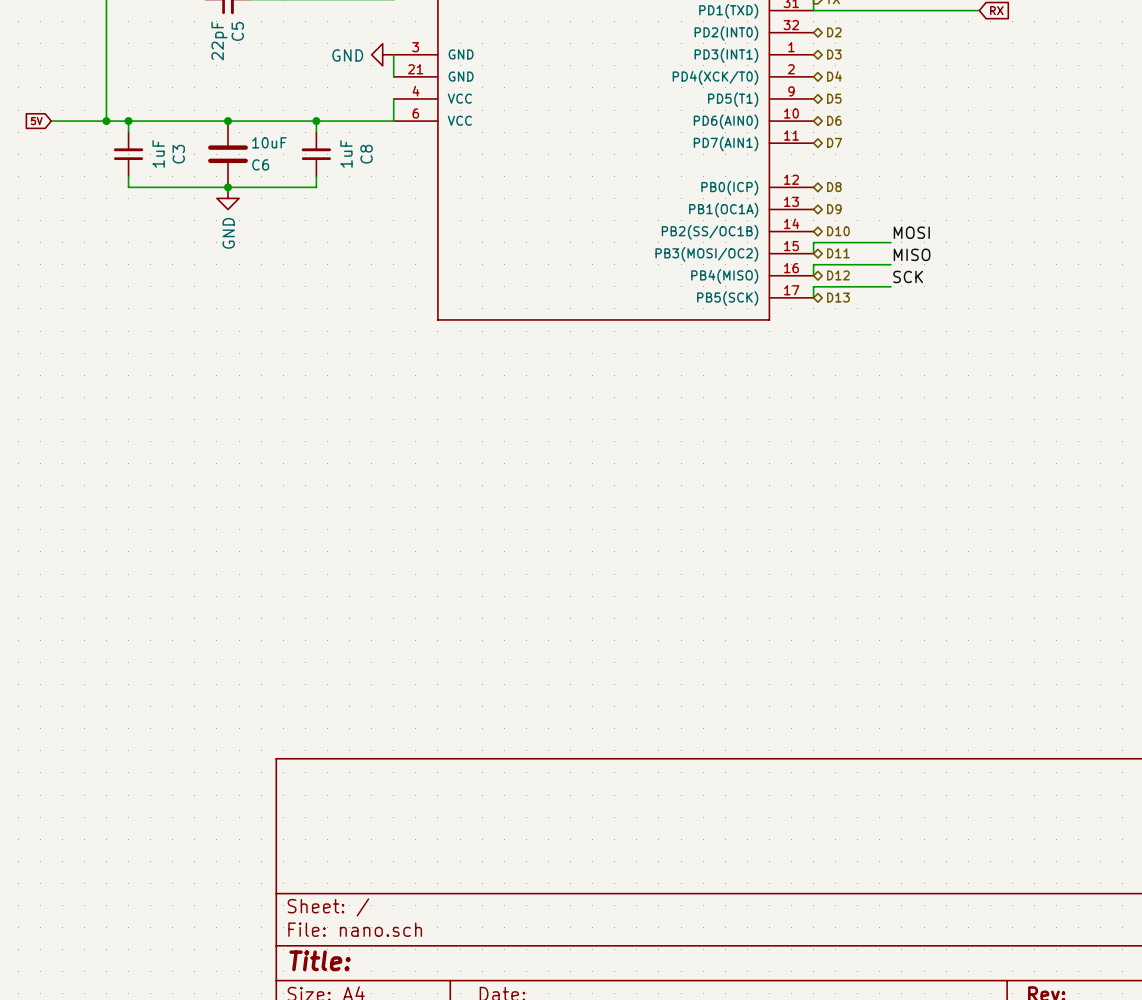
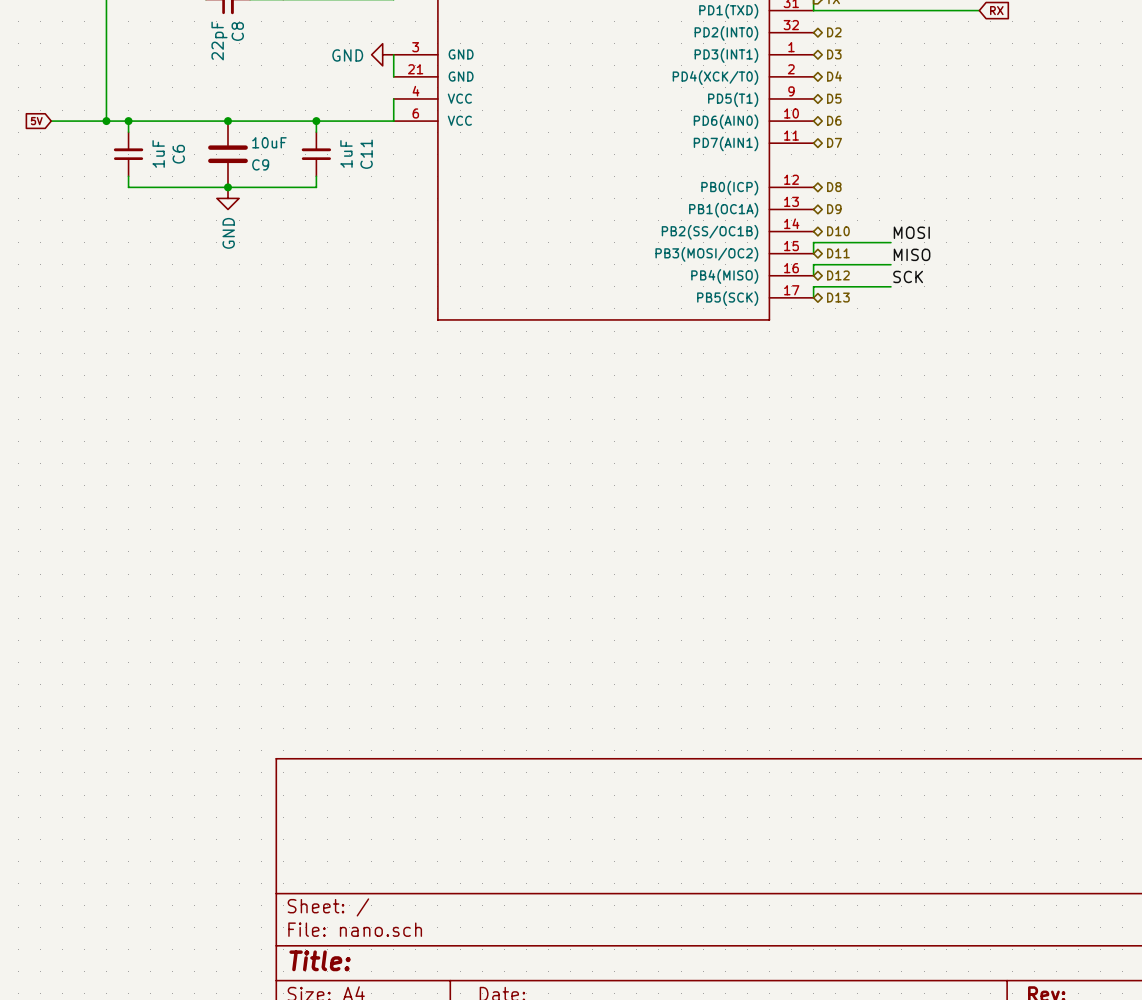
C5 name: C5 (237, 31) -> C8 (237, 31)
C3 name: C3 (178, 154) -> C6 (178, 154)
C8 name: C8 (366, 154) -> C11 (366, 154)
C6 name: C6 (260, 164) -> C9 (260, 164)

